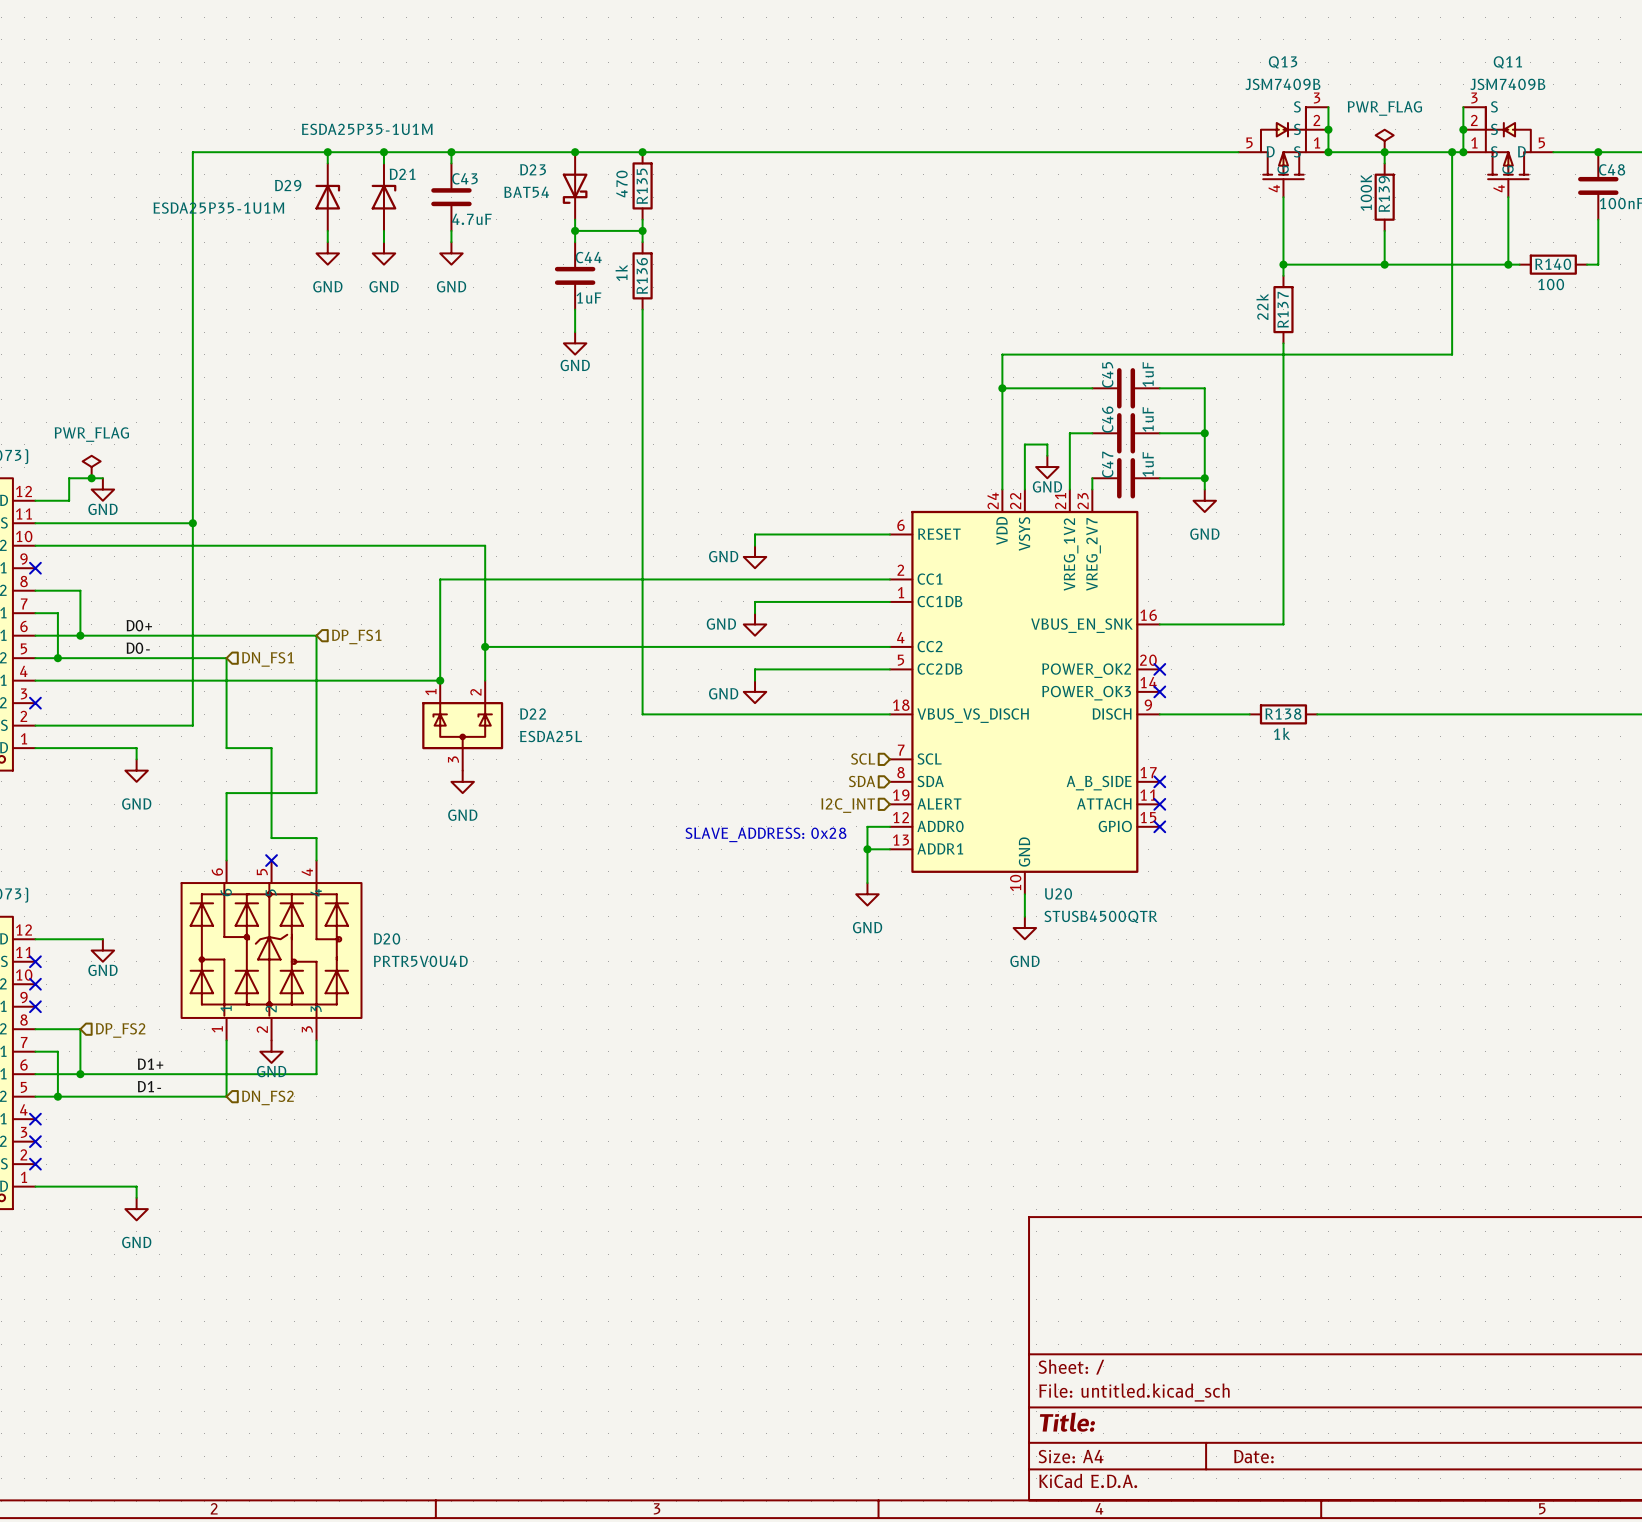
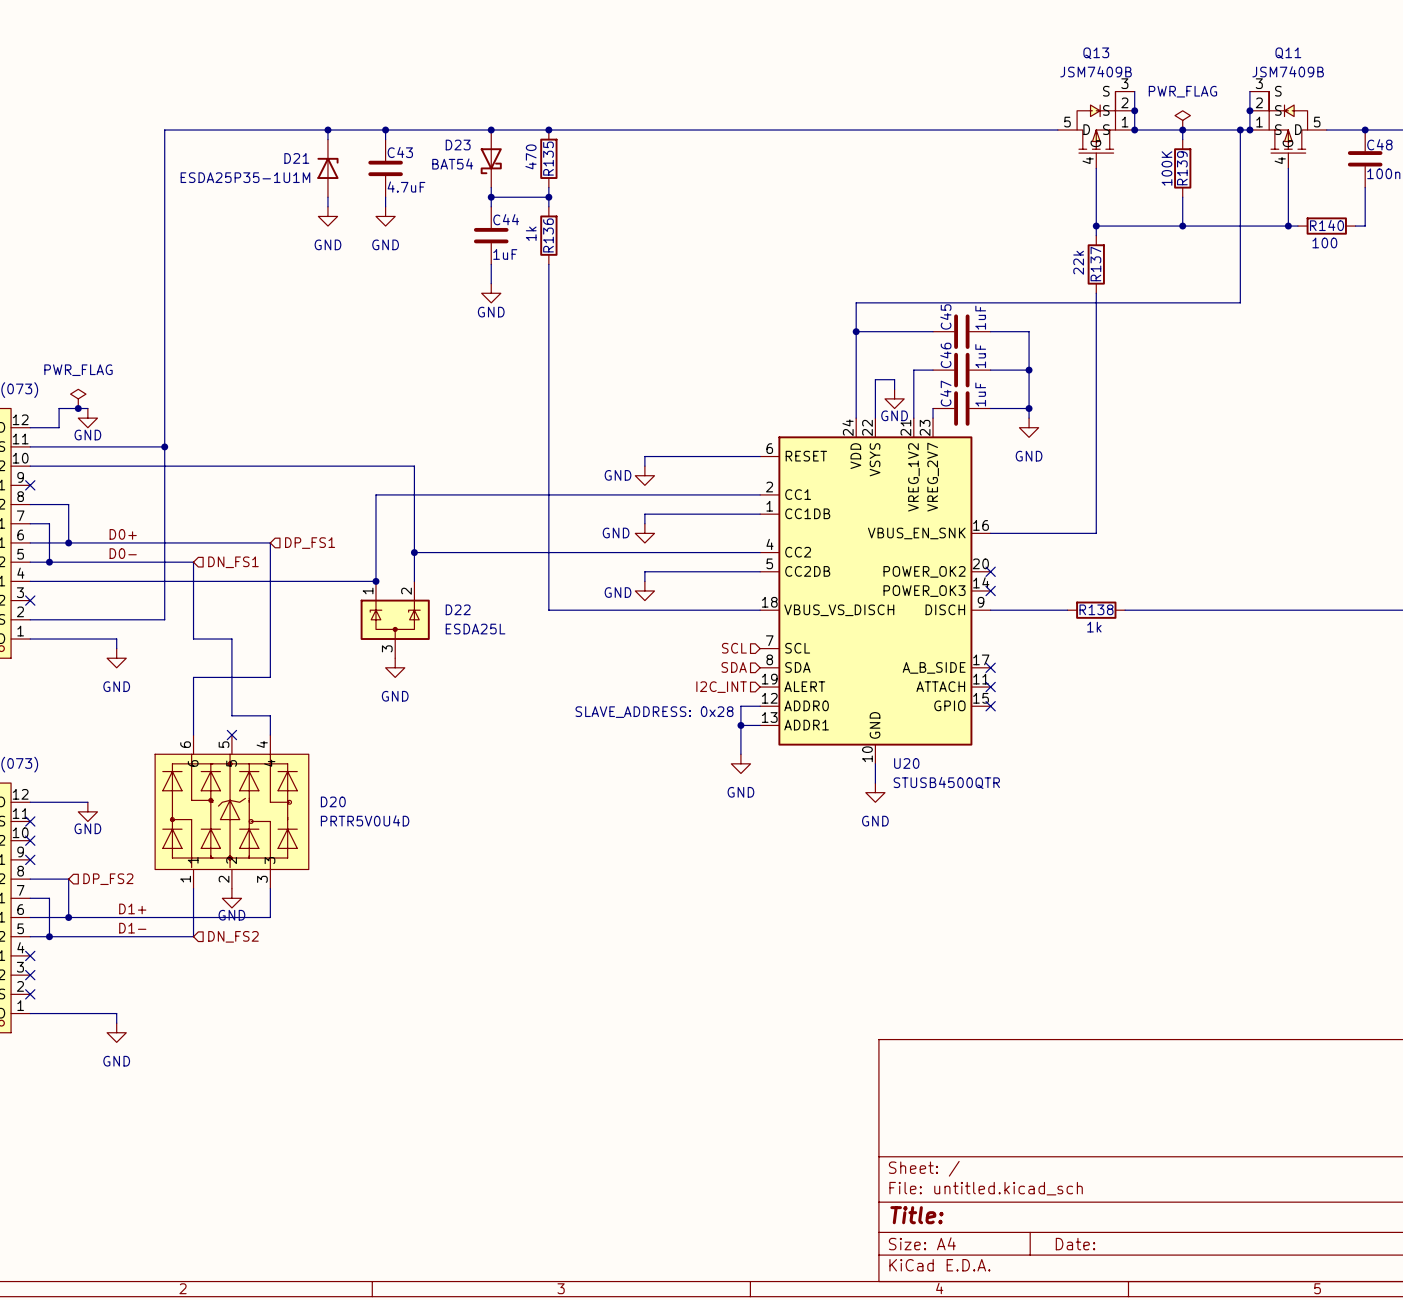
D21 value position: ESDA25P35-1U1M (367, 129) -> ESDA25P35-1U1M (245, 177)
wire: (327, 152) (327, 163) -> none
junction: (327, 152) -> none
D21 name position: D21 (402, 174) -> D21 (296, 158)
D29: ESDA25P35-1U1M (327, 197) -> none
wire: (327, 230) (327, 242) -> none
power symbol: GND (327, 253) -> none

